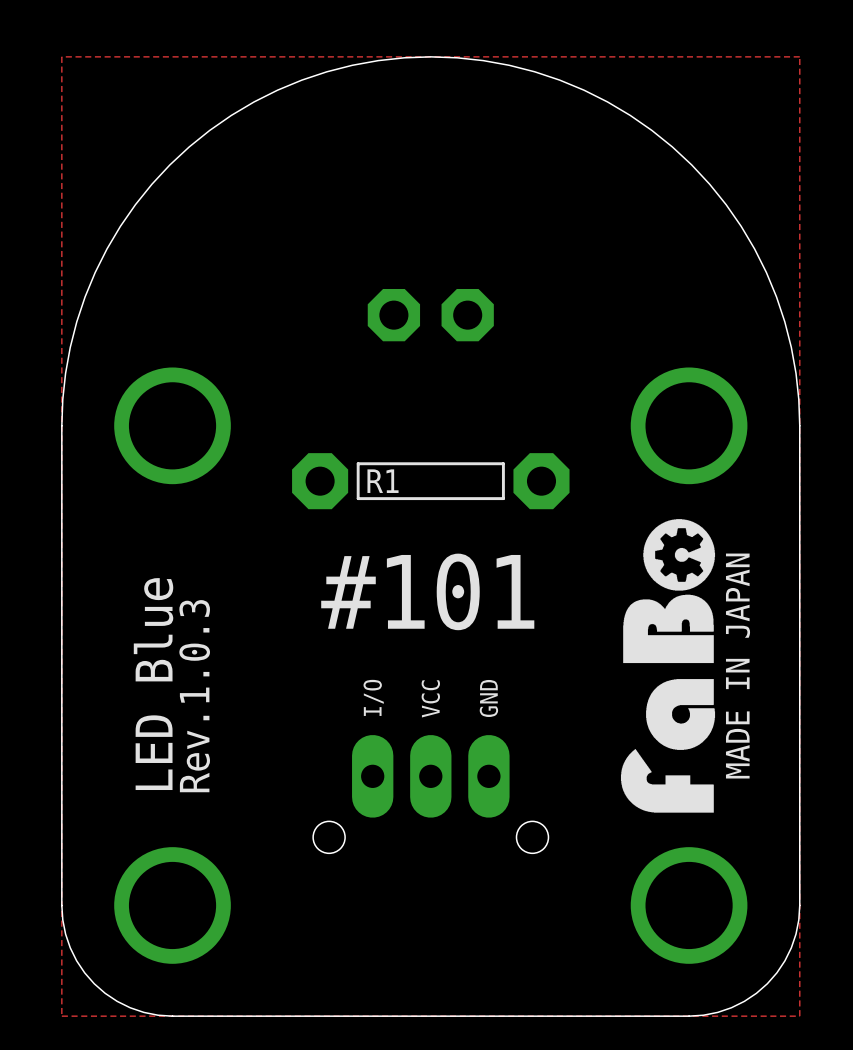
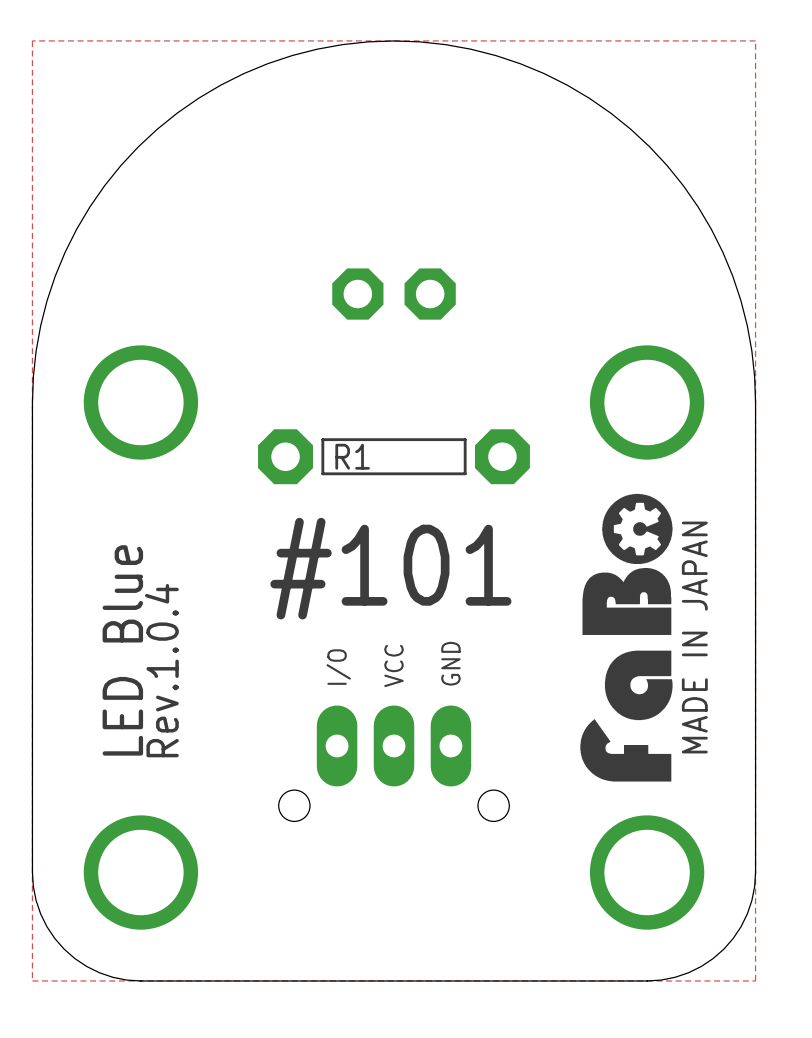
text: Rev.1.0.3 (194, 696) -> Rev.1.0.4 (161, 670)

